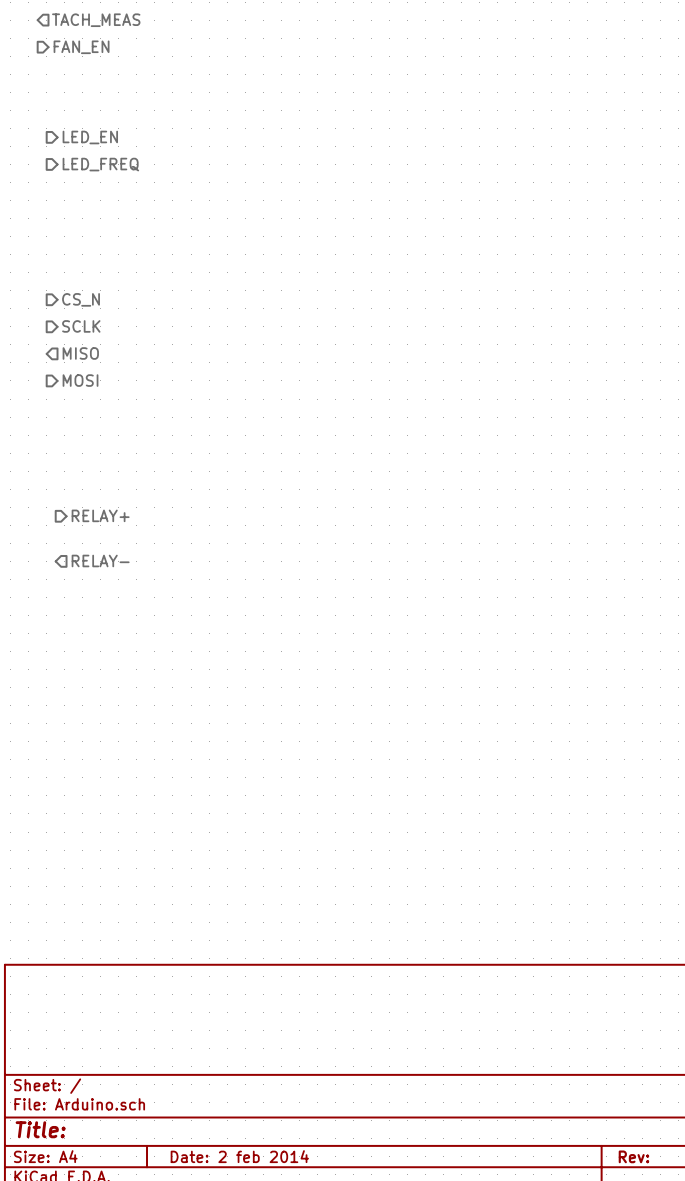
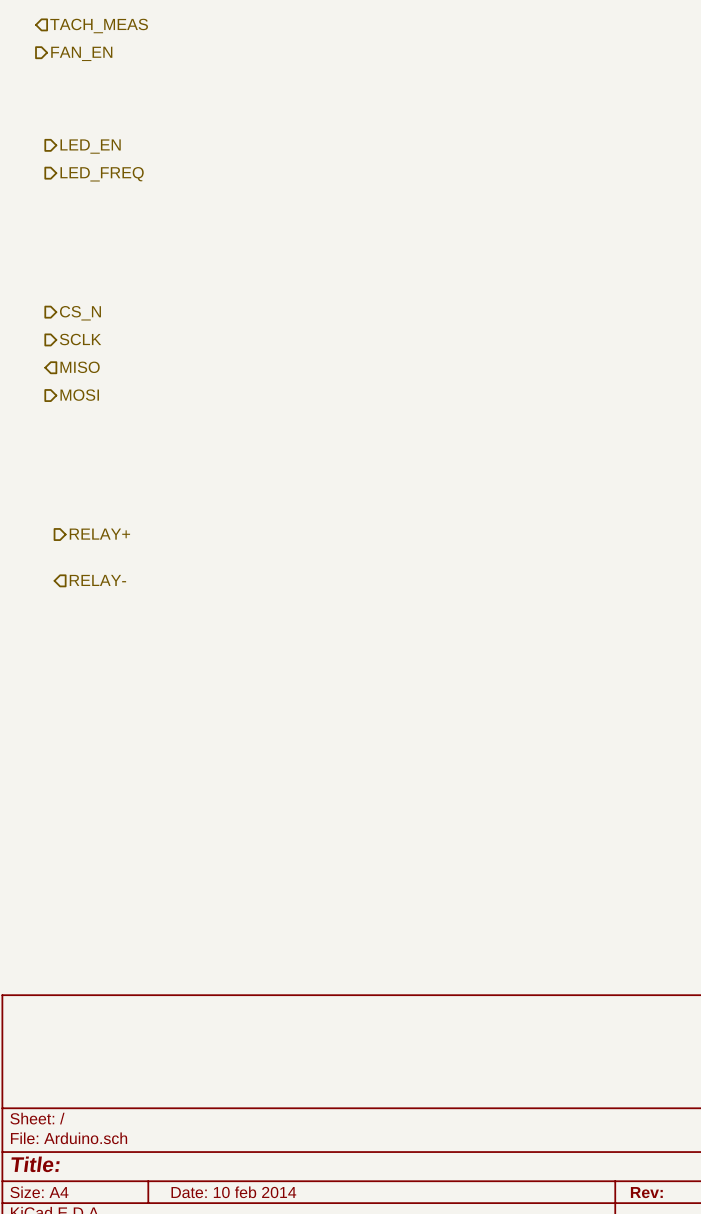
title block: Date: 2 feb 2014 (239, 1156) -> Date: 10 feb 2014 (233, 1192)

